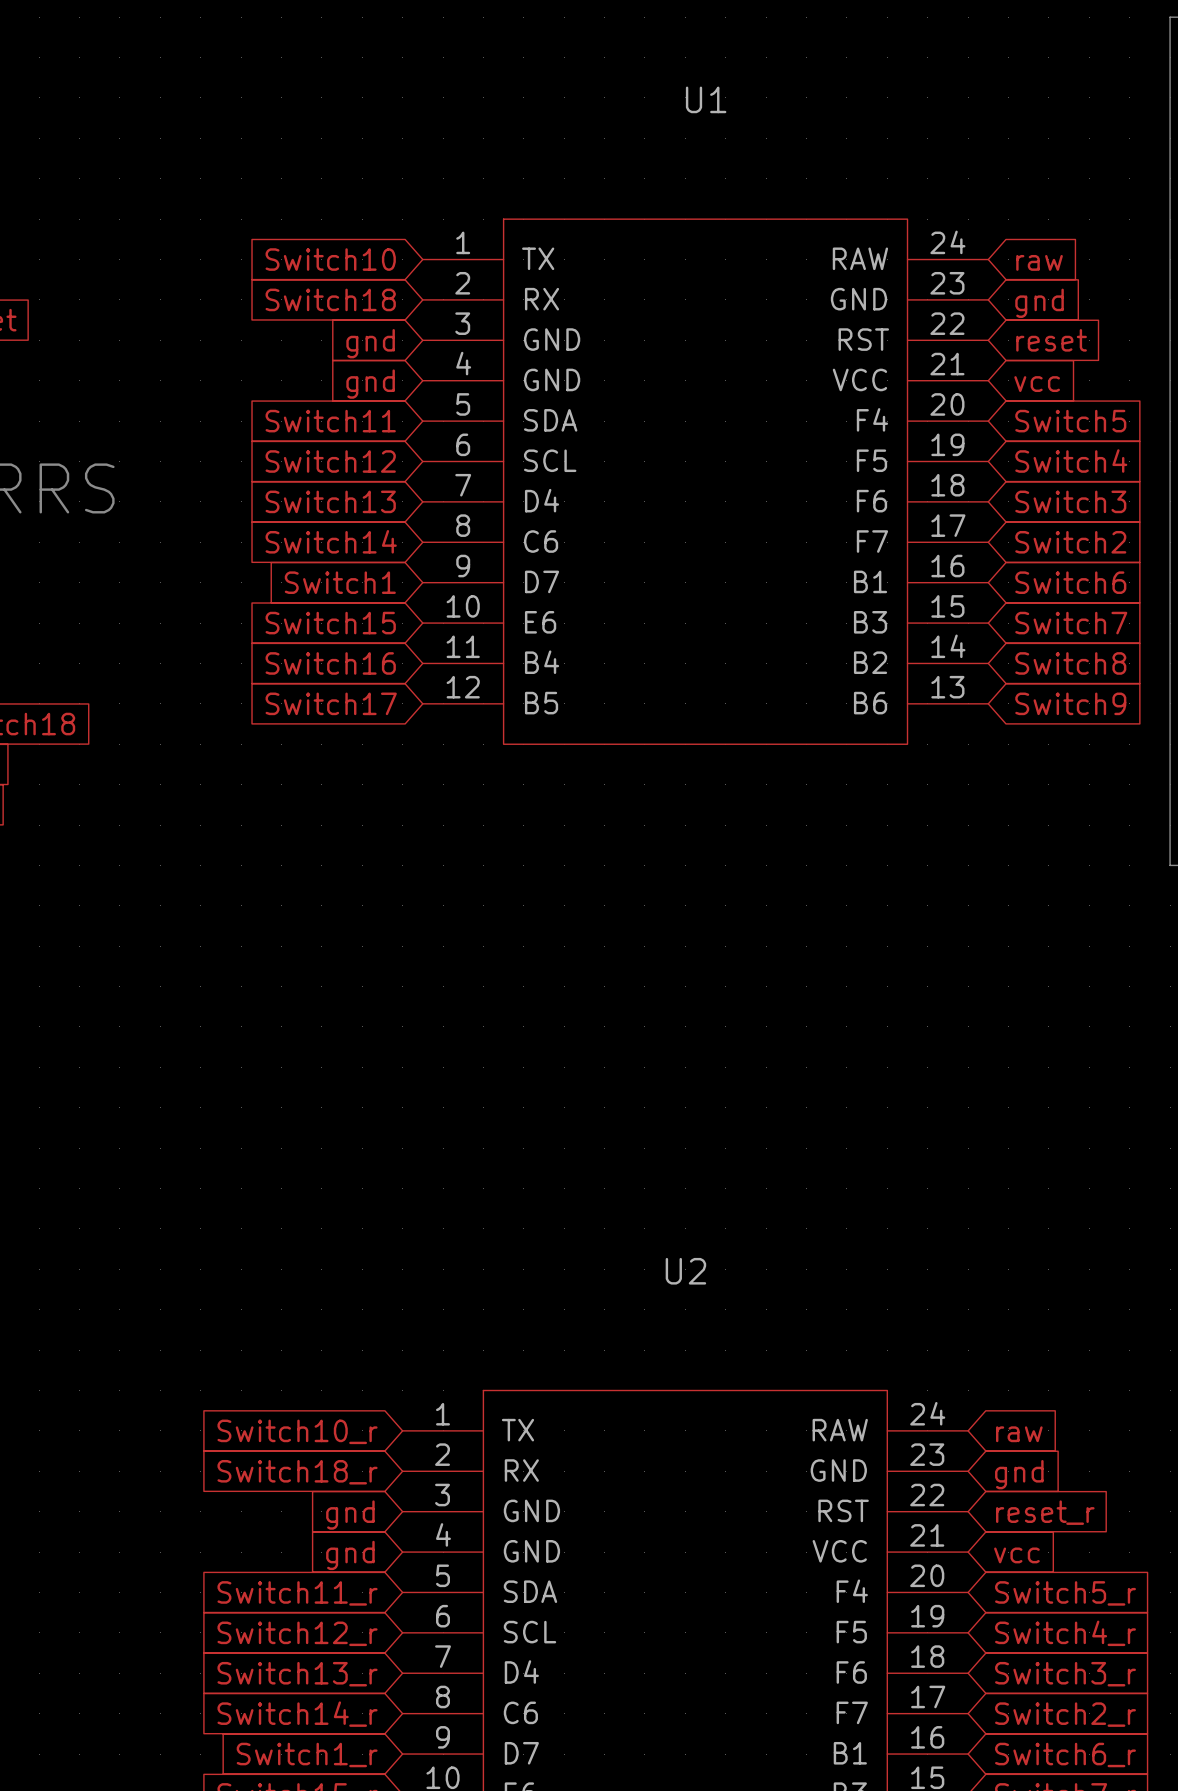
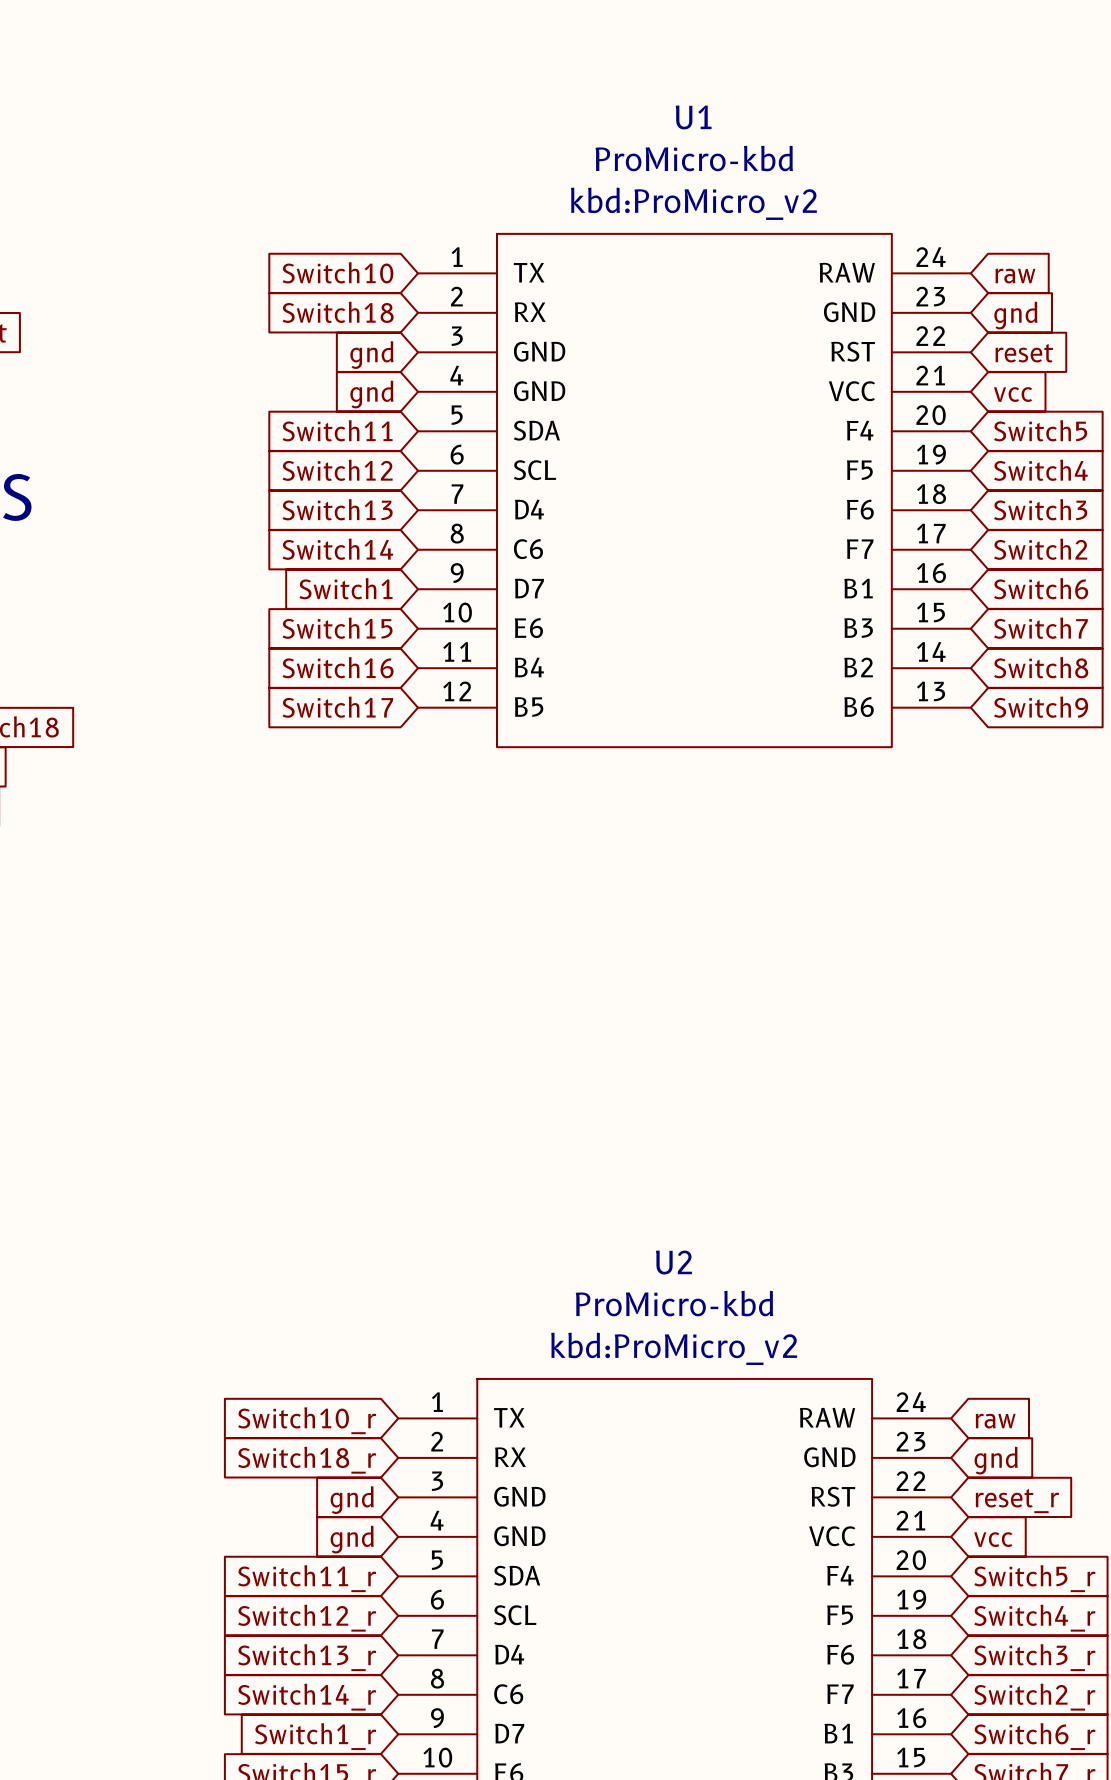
U1 value: none -> ProMicro-kbd (694, 158)
U1 text: none -> kbd:ProMicro_v2 (693, 203)
U2 value: none -> ProMicro-kbd (674, 1303)
U2 text: none -> kbd:ProMicro_v2 (674, 1348)

